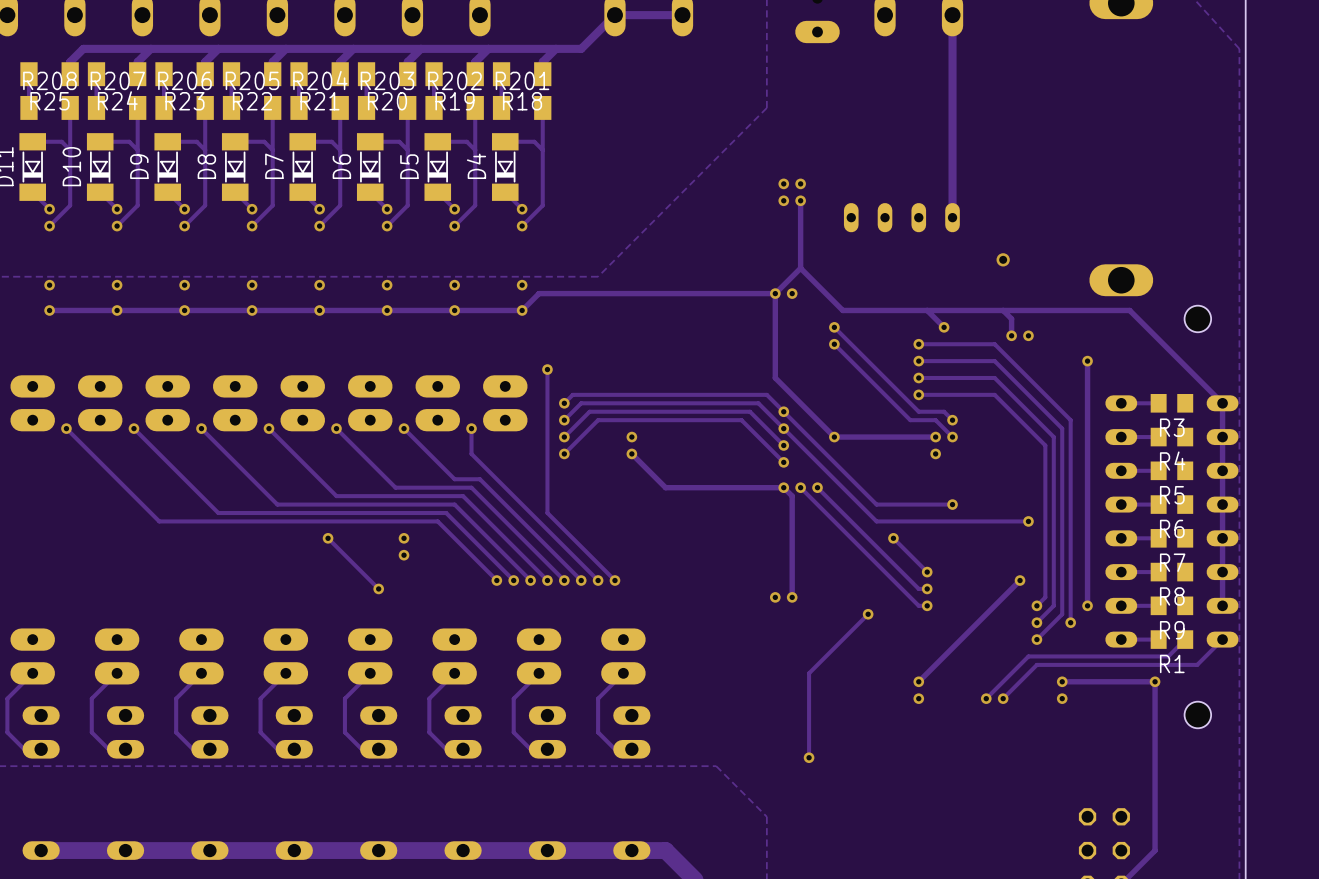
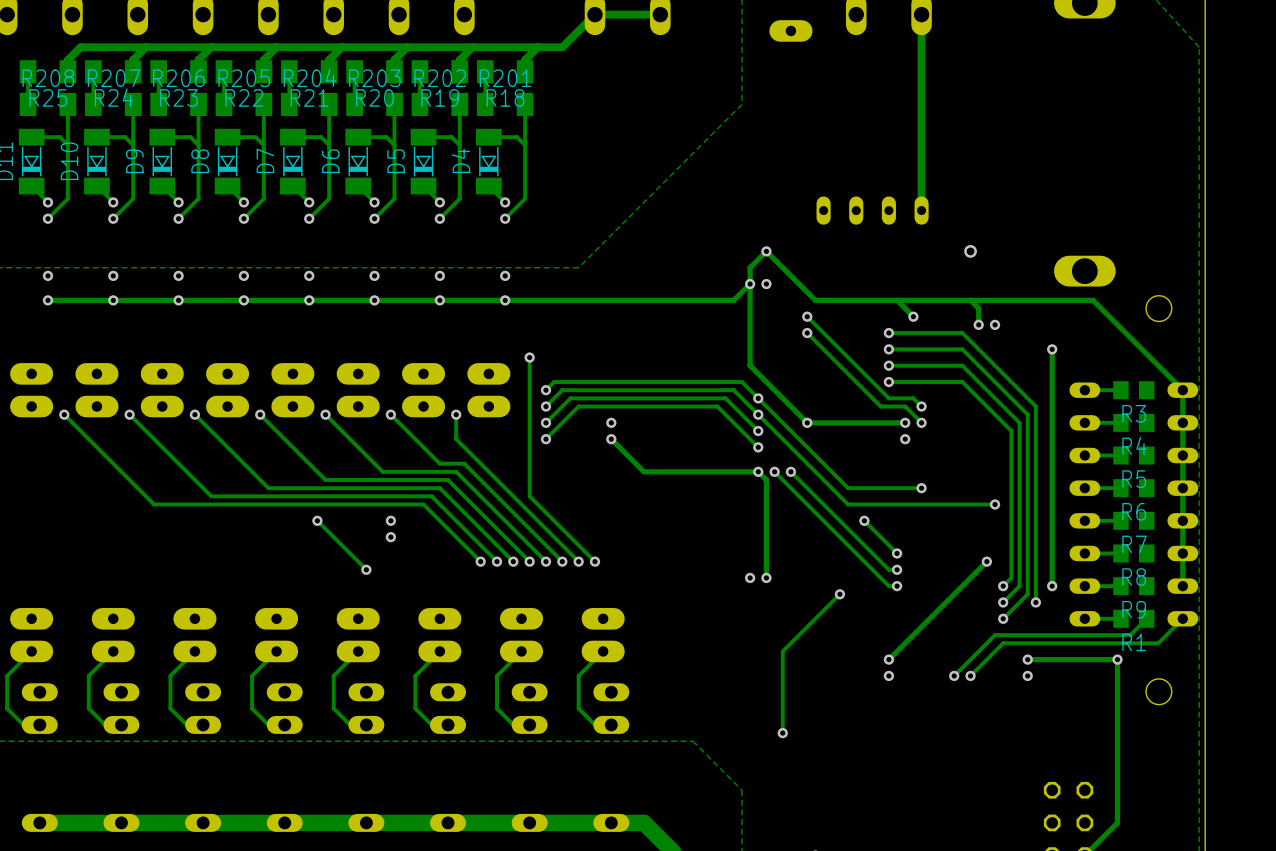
via: (783, 183) -> none
via: (800, 183) -> none
via: (783, 200) -> none
track: (800, 200) (800, 268) (775, 293) (539, 293) (522, 310) -> (774, 259) (766, 251) (750, 267) (750, 284) (733, 300) (505, 300)
via: (800, 200) -> none
via: none -> (766, 251)

